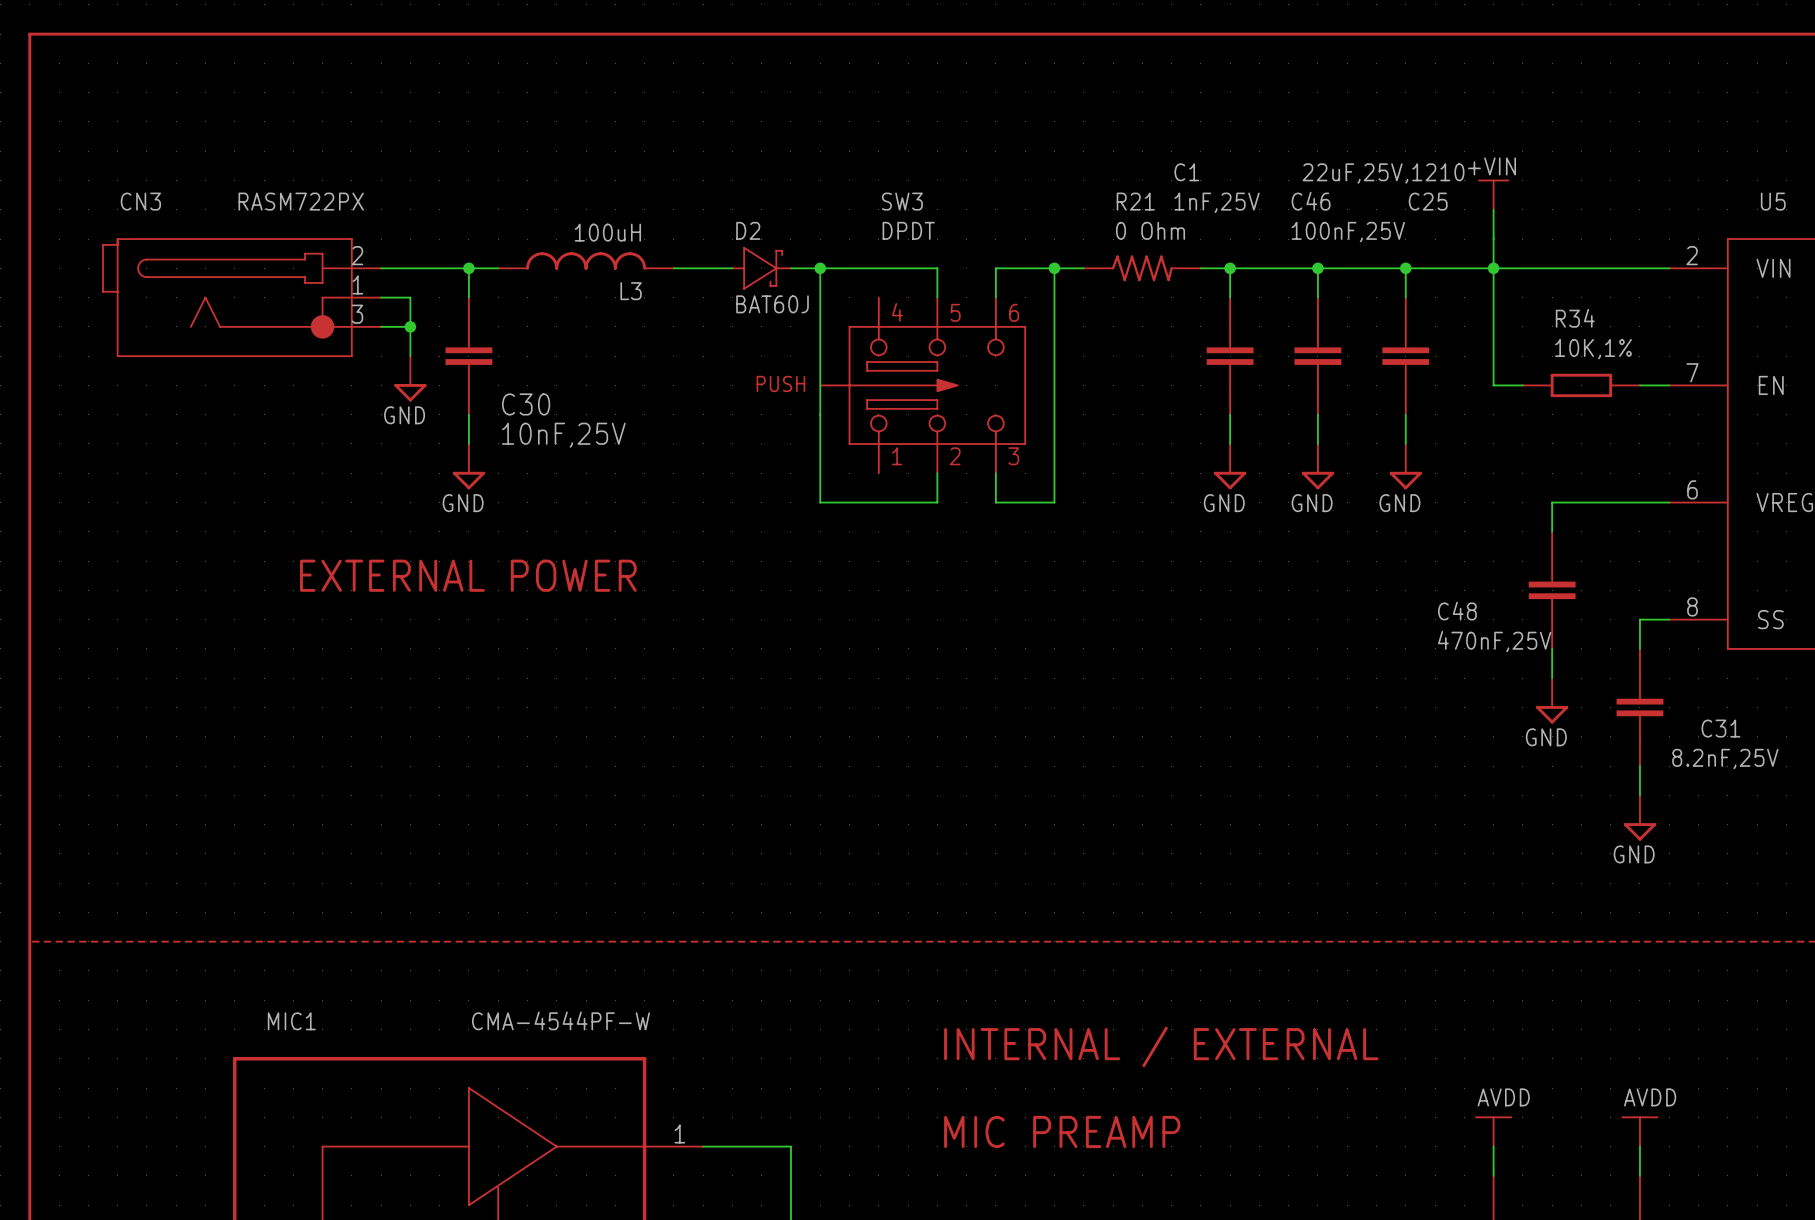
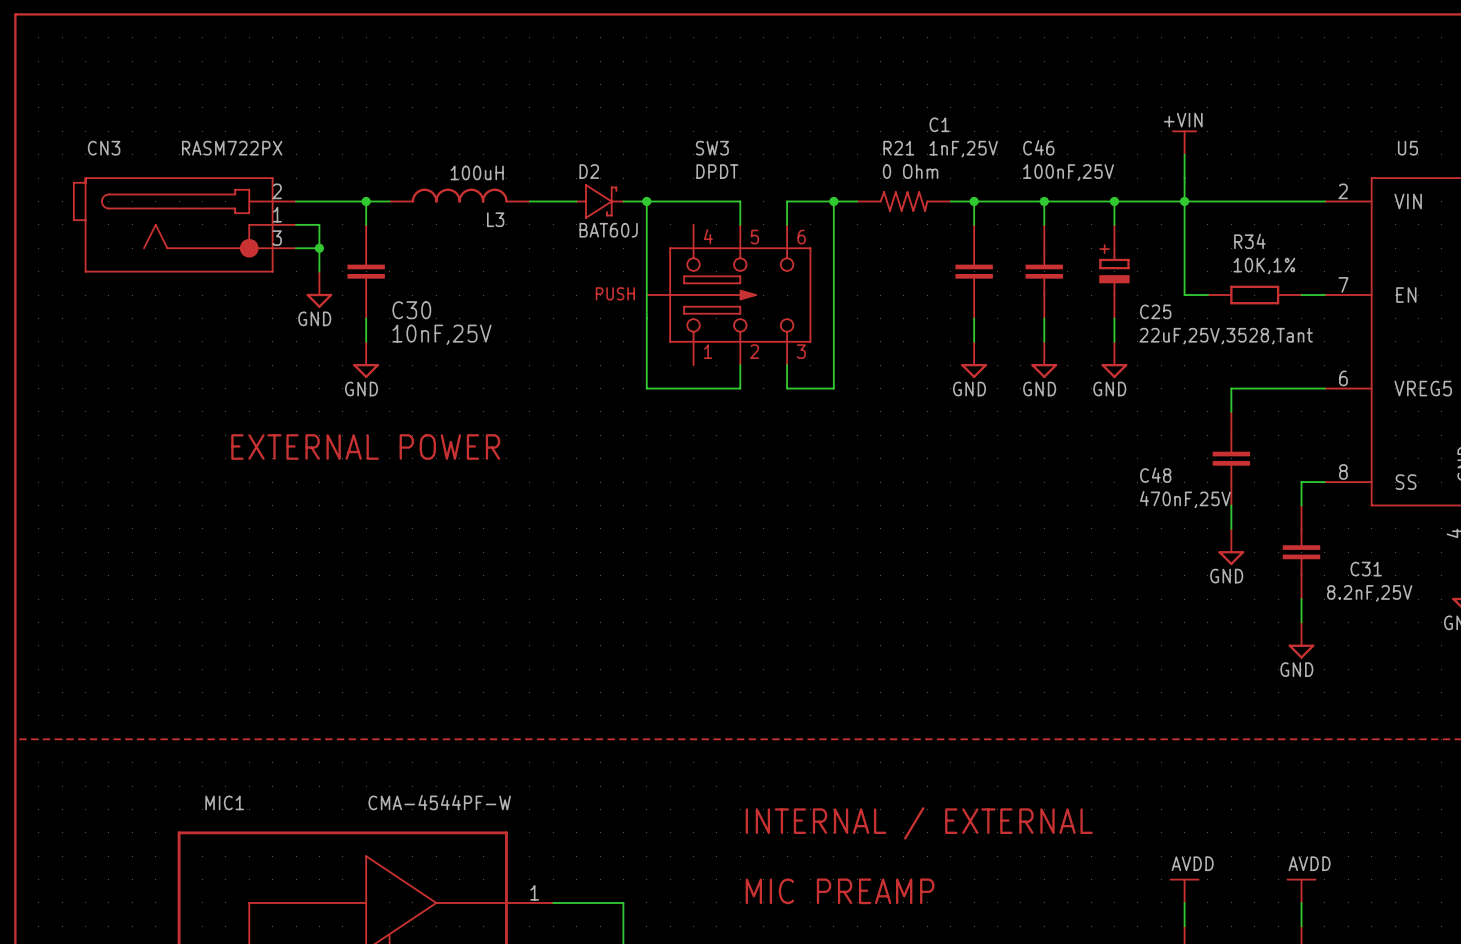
C25 value: 22uF,25V,1210 (1383, 173) -> 22uF,25V,3528,Tant (1226, 336)
C25 name position: C25 (1428, 201) -> C25 (1155, 311)
C25 symbol: [1382, 297, 1430, 415] -> [1099, 224, 1130, 319]

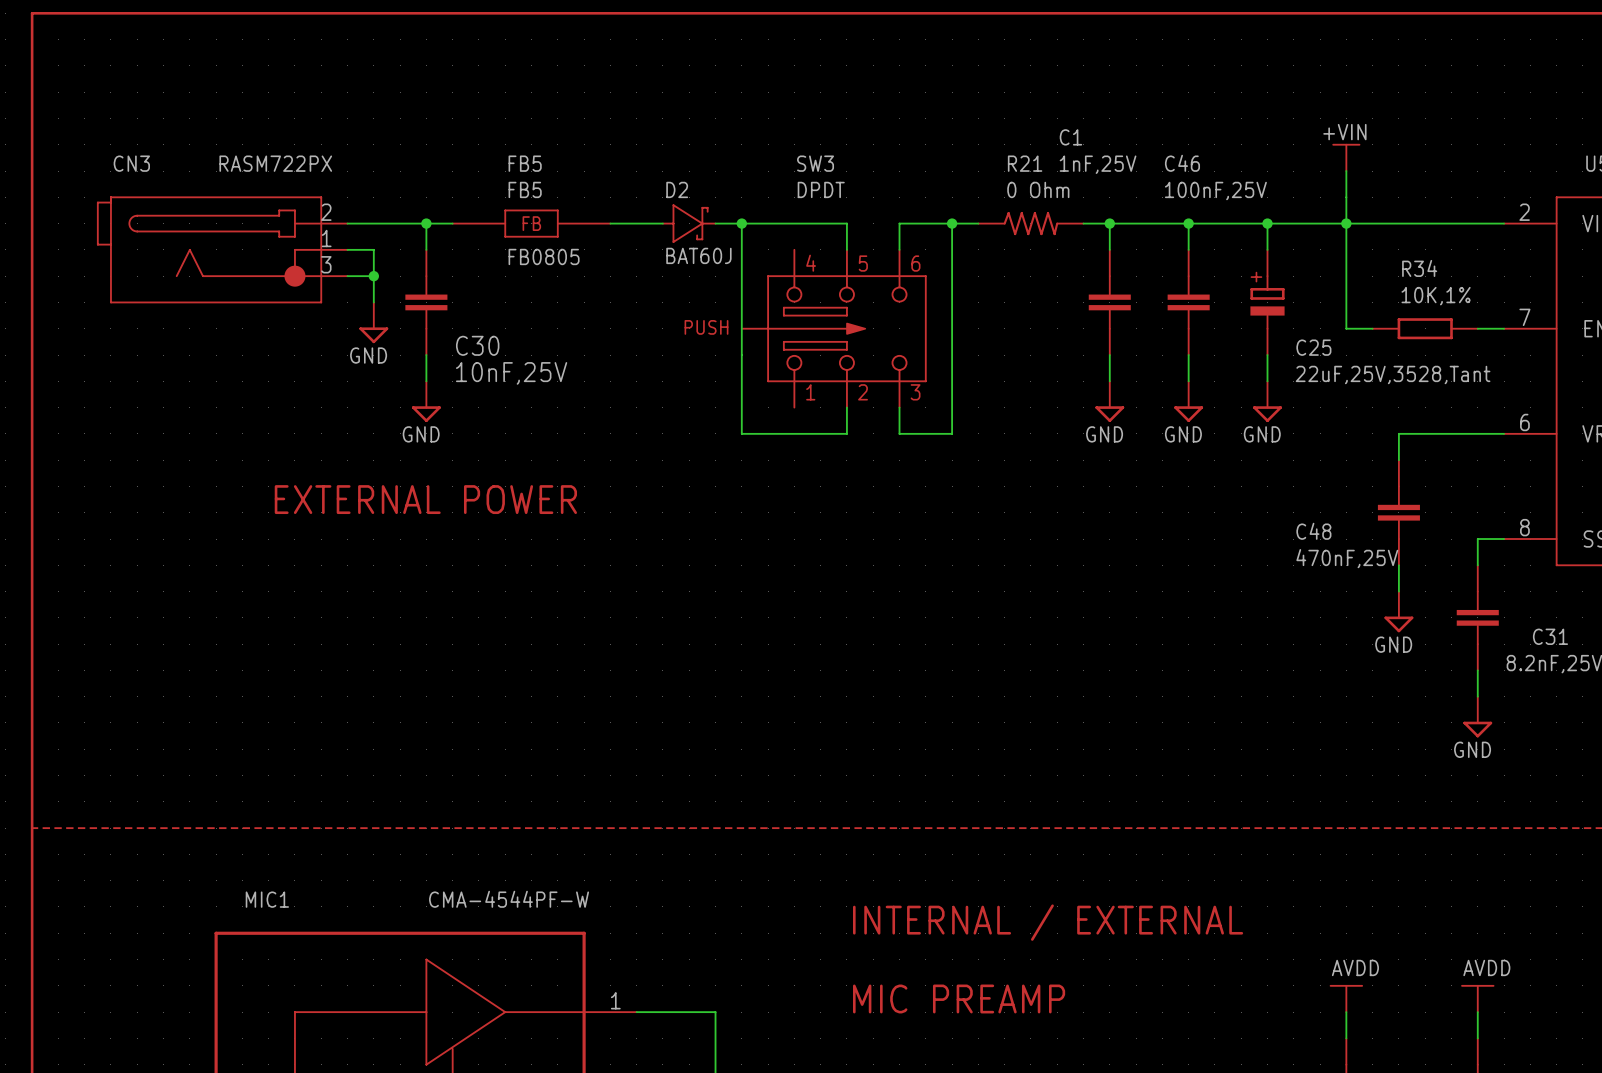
text: none -> FB5 (525, 163)
L3: 100uH (459, 195) -> none
FB5: none -> FB0805 (531, 223)

